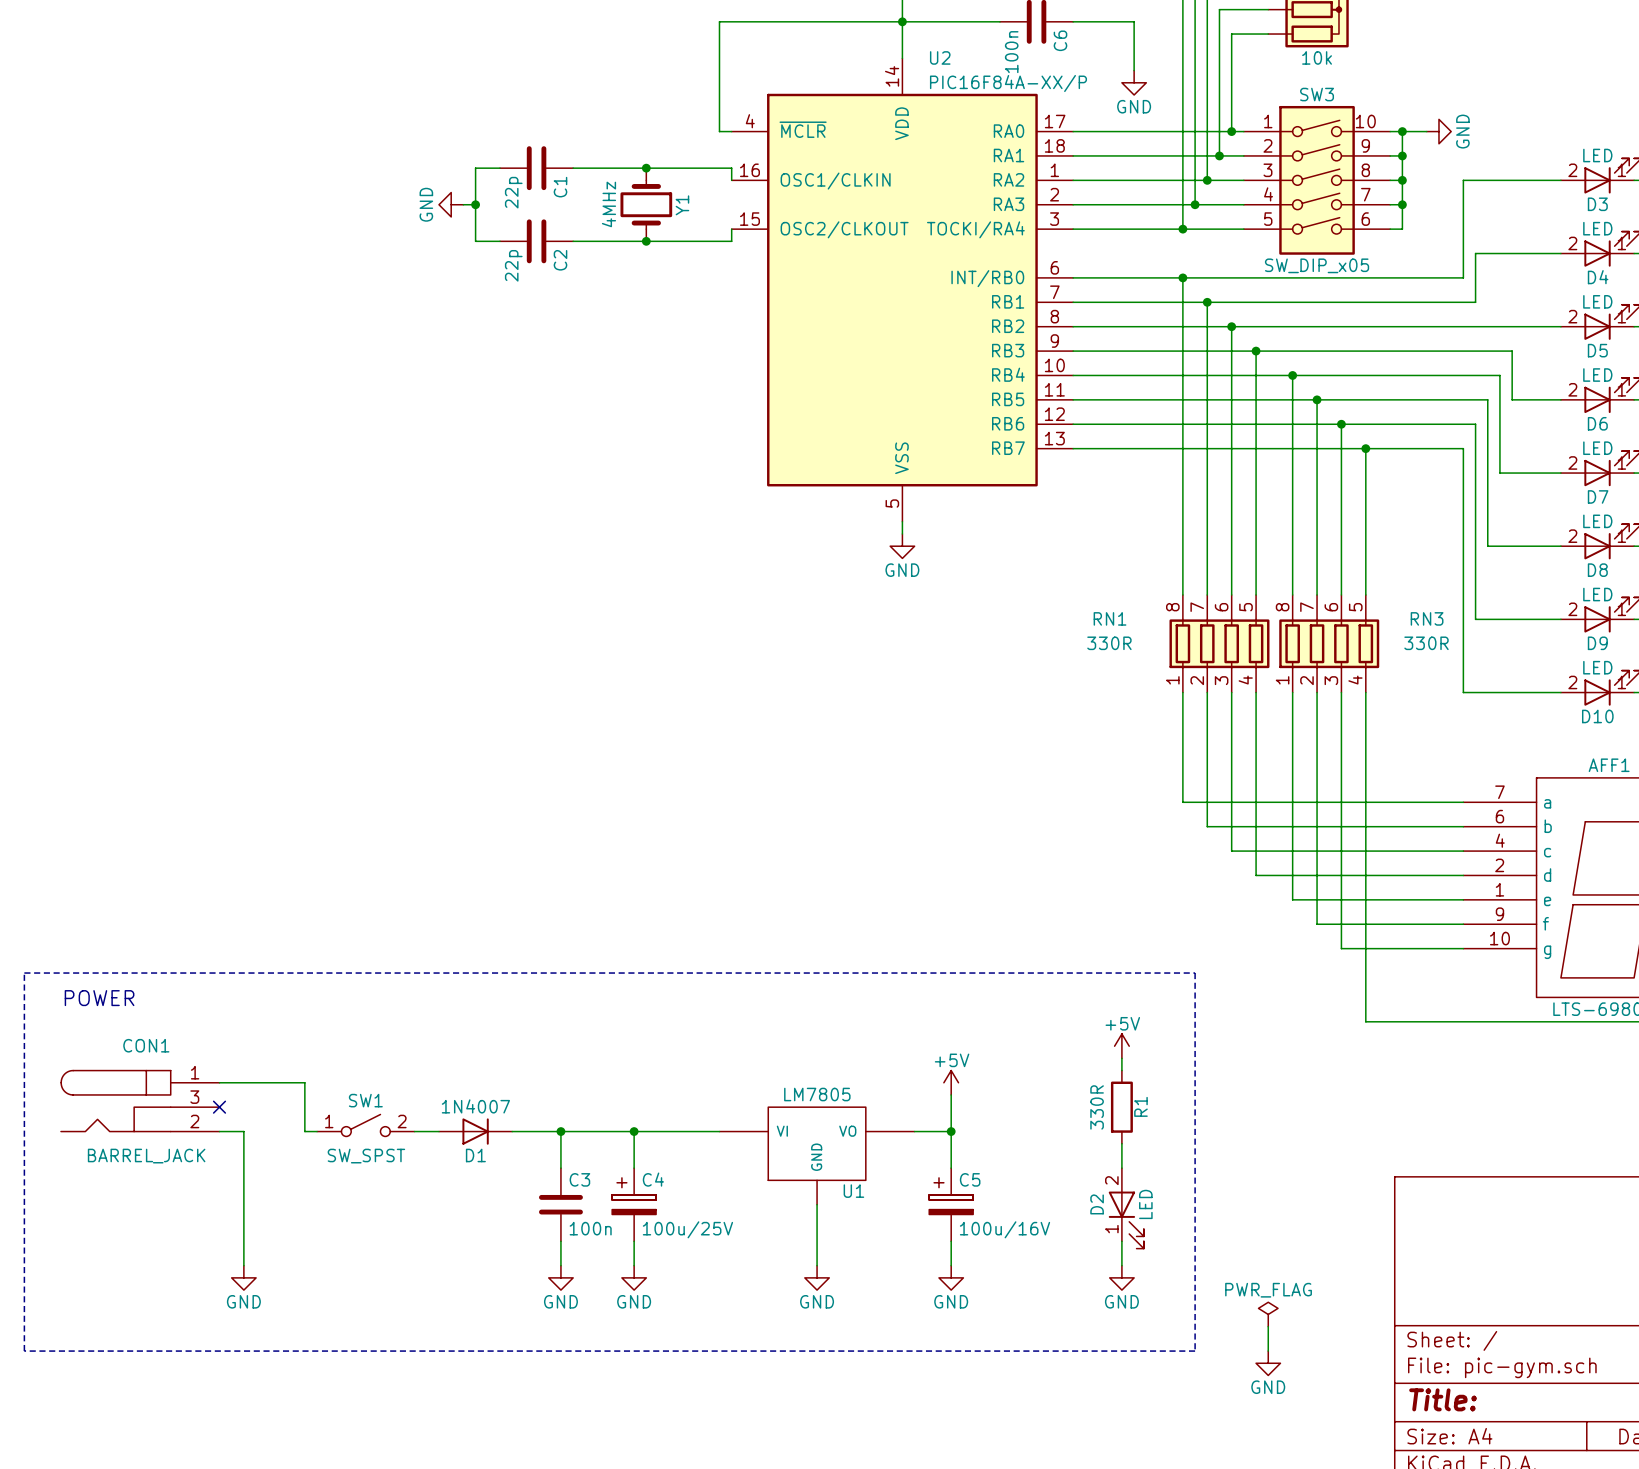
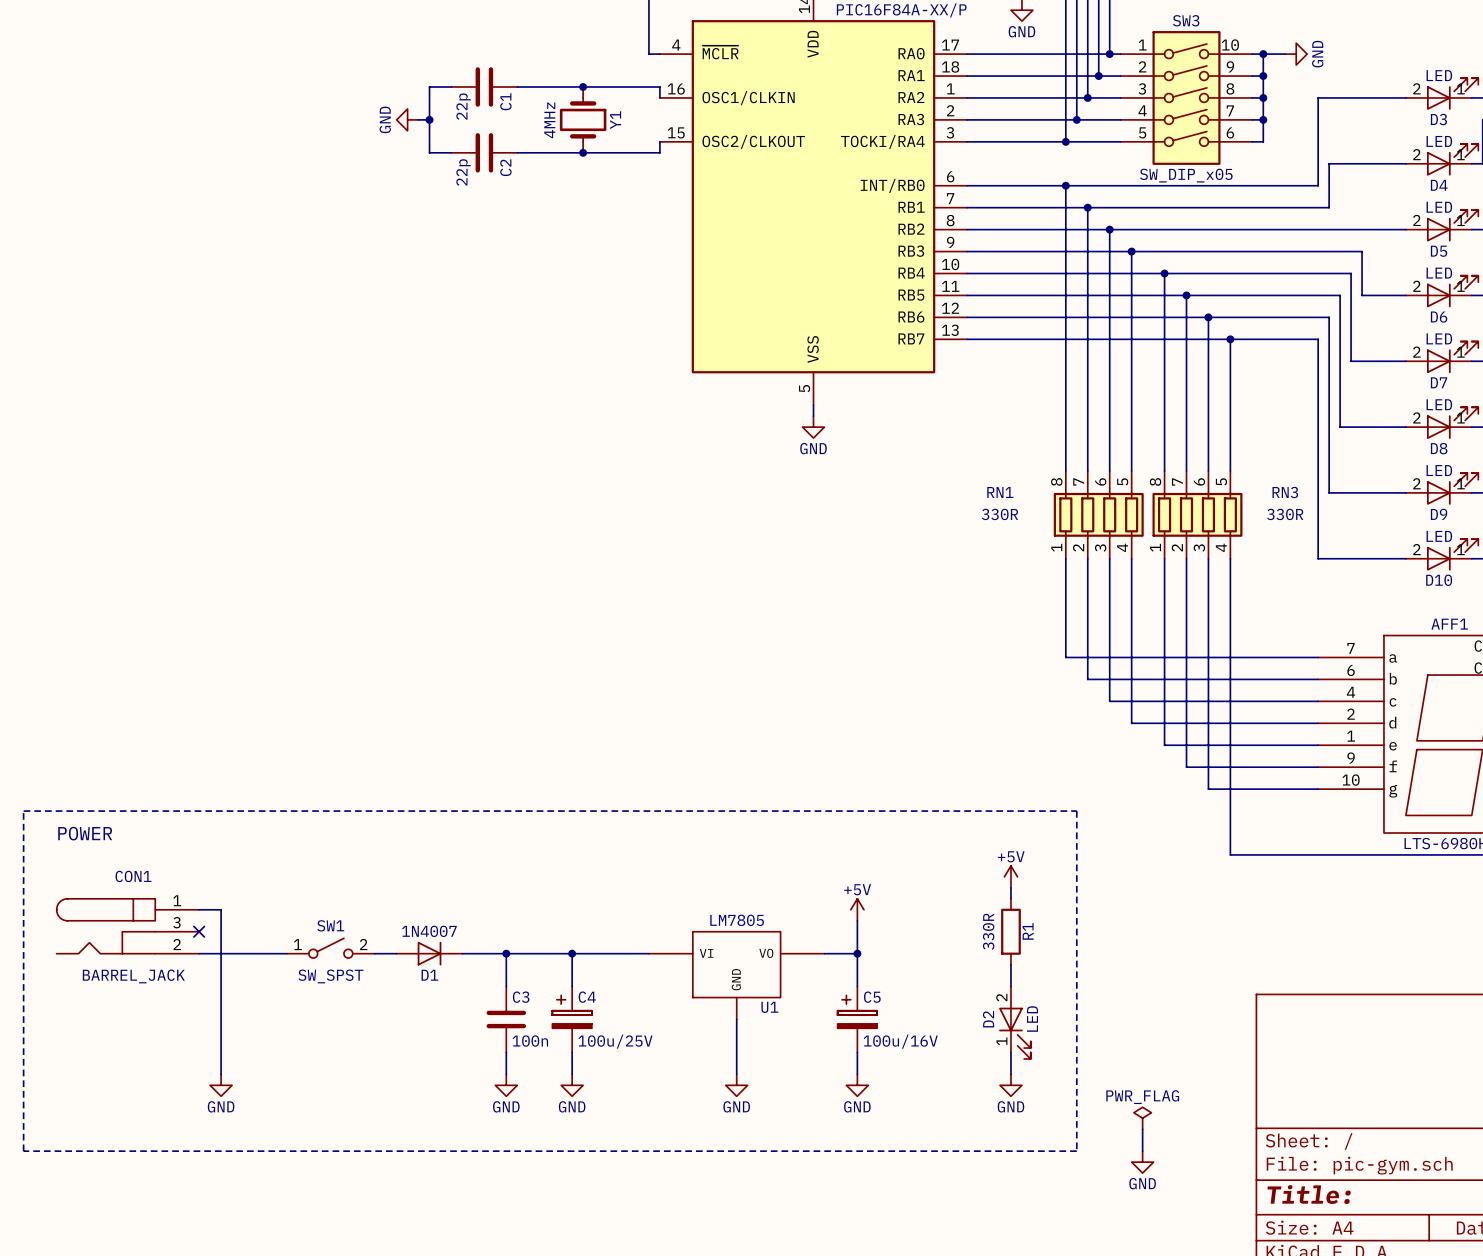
wire: (243, 1082) (304, 1082) (304, 1131) -> (221, 909) (221, 953) (275, 953)

